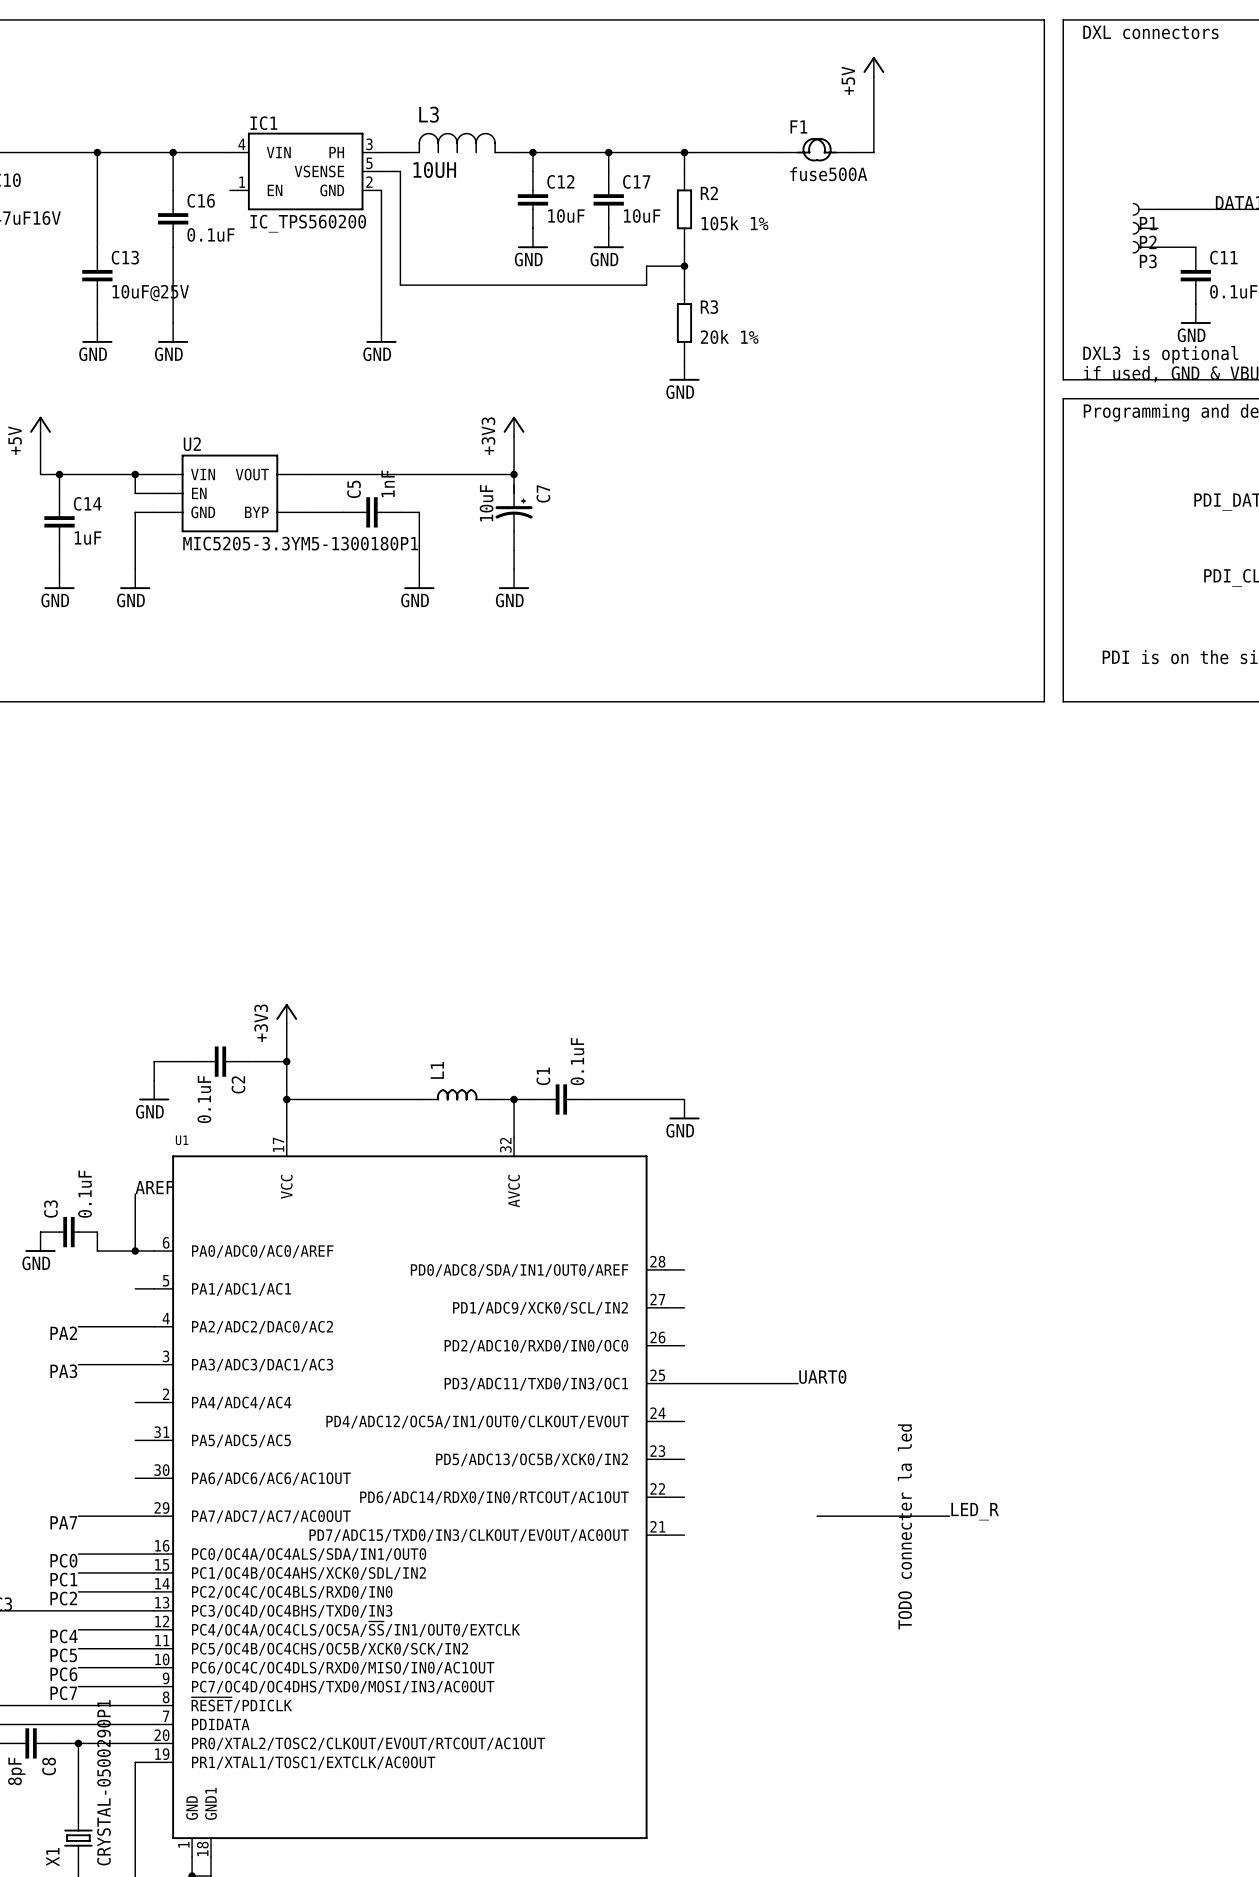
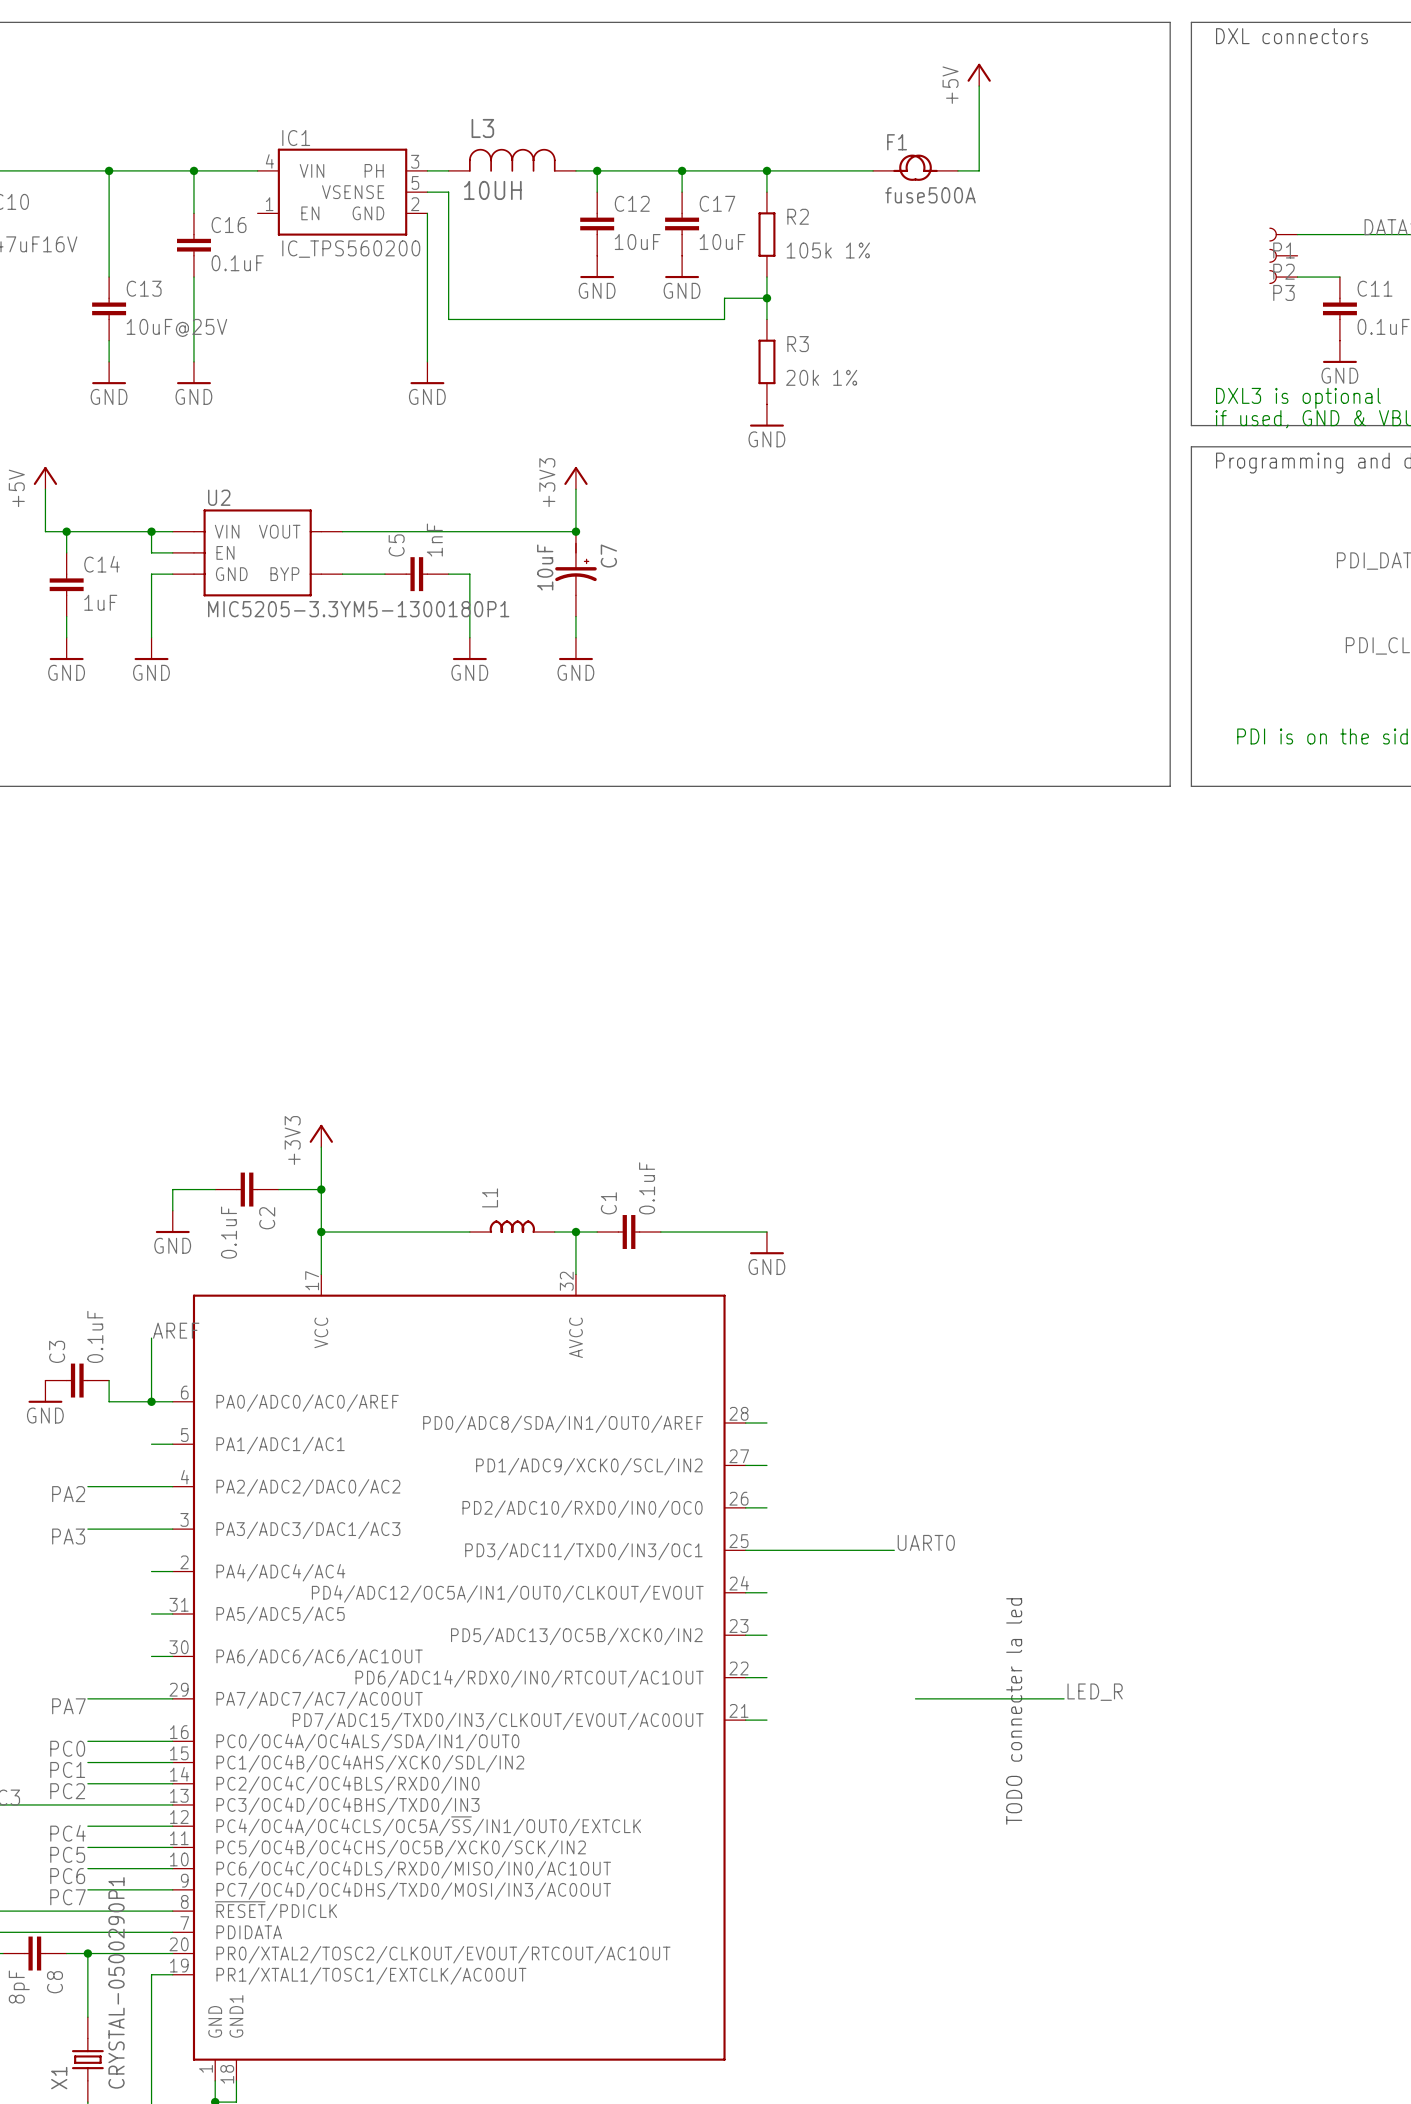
U1 name: U1 (182, 1140) -> none

